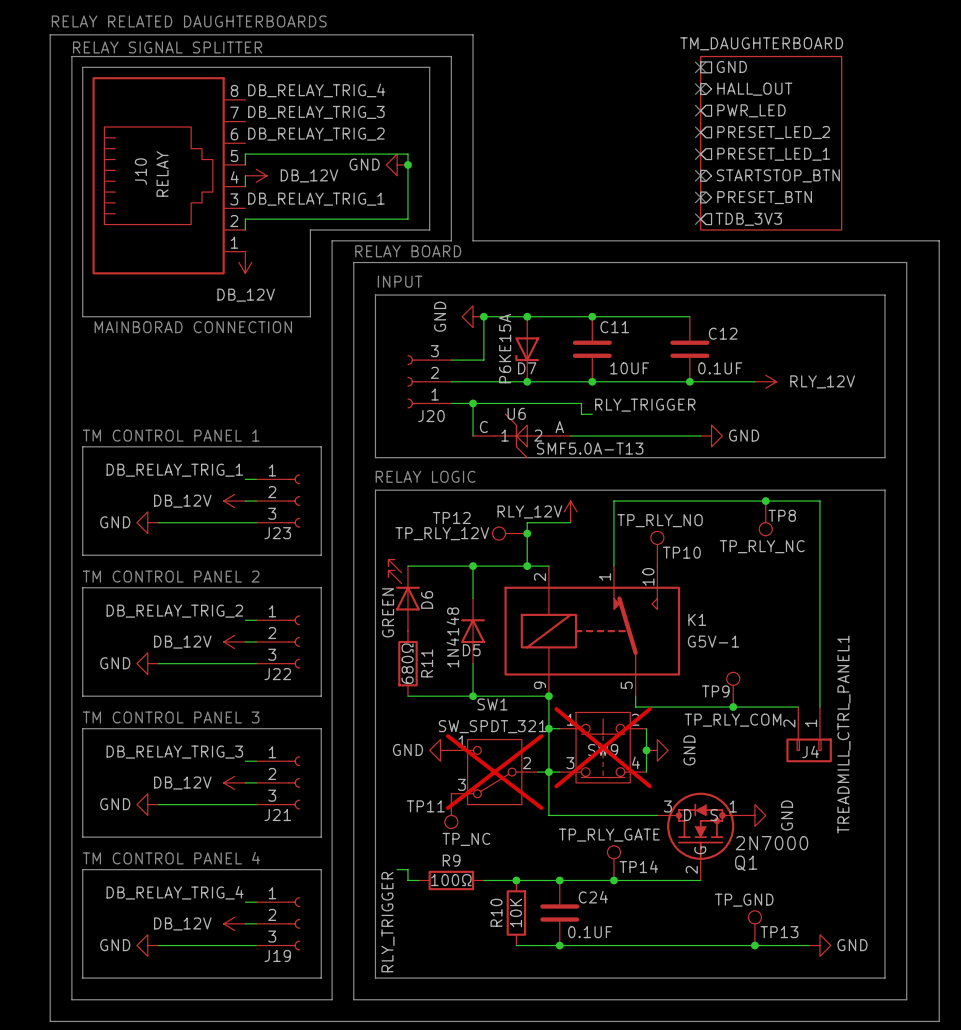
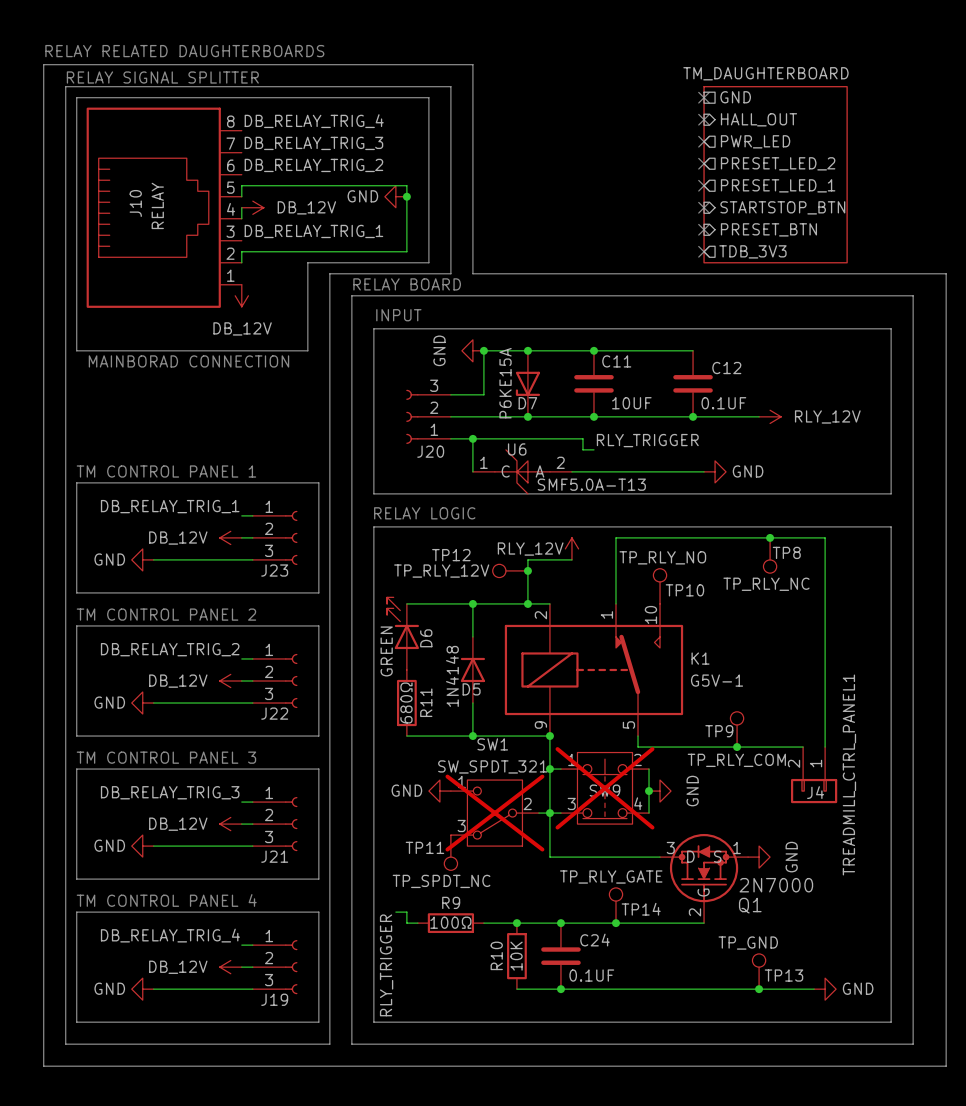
U6 pin number: C (483, 427) -> 1 (483, 462)
U6 pin number: A (559, 427) -> 2 (560, 462)
U6 pin name: 1 (505, 435) -> C (505, 471)
U6 pin name: 2 (538, 435) -> A (539, 471)
TP11 value: TP_NC (466, 839) -> TP_SPDT_NC (441, 881)

